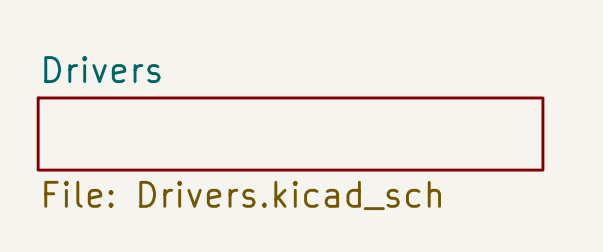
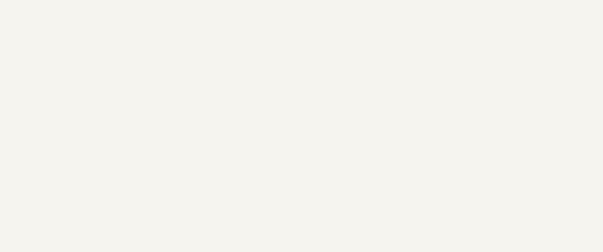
sheet Drivers: File: Drivers.kicad_sch (290, 134) -> none

